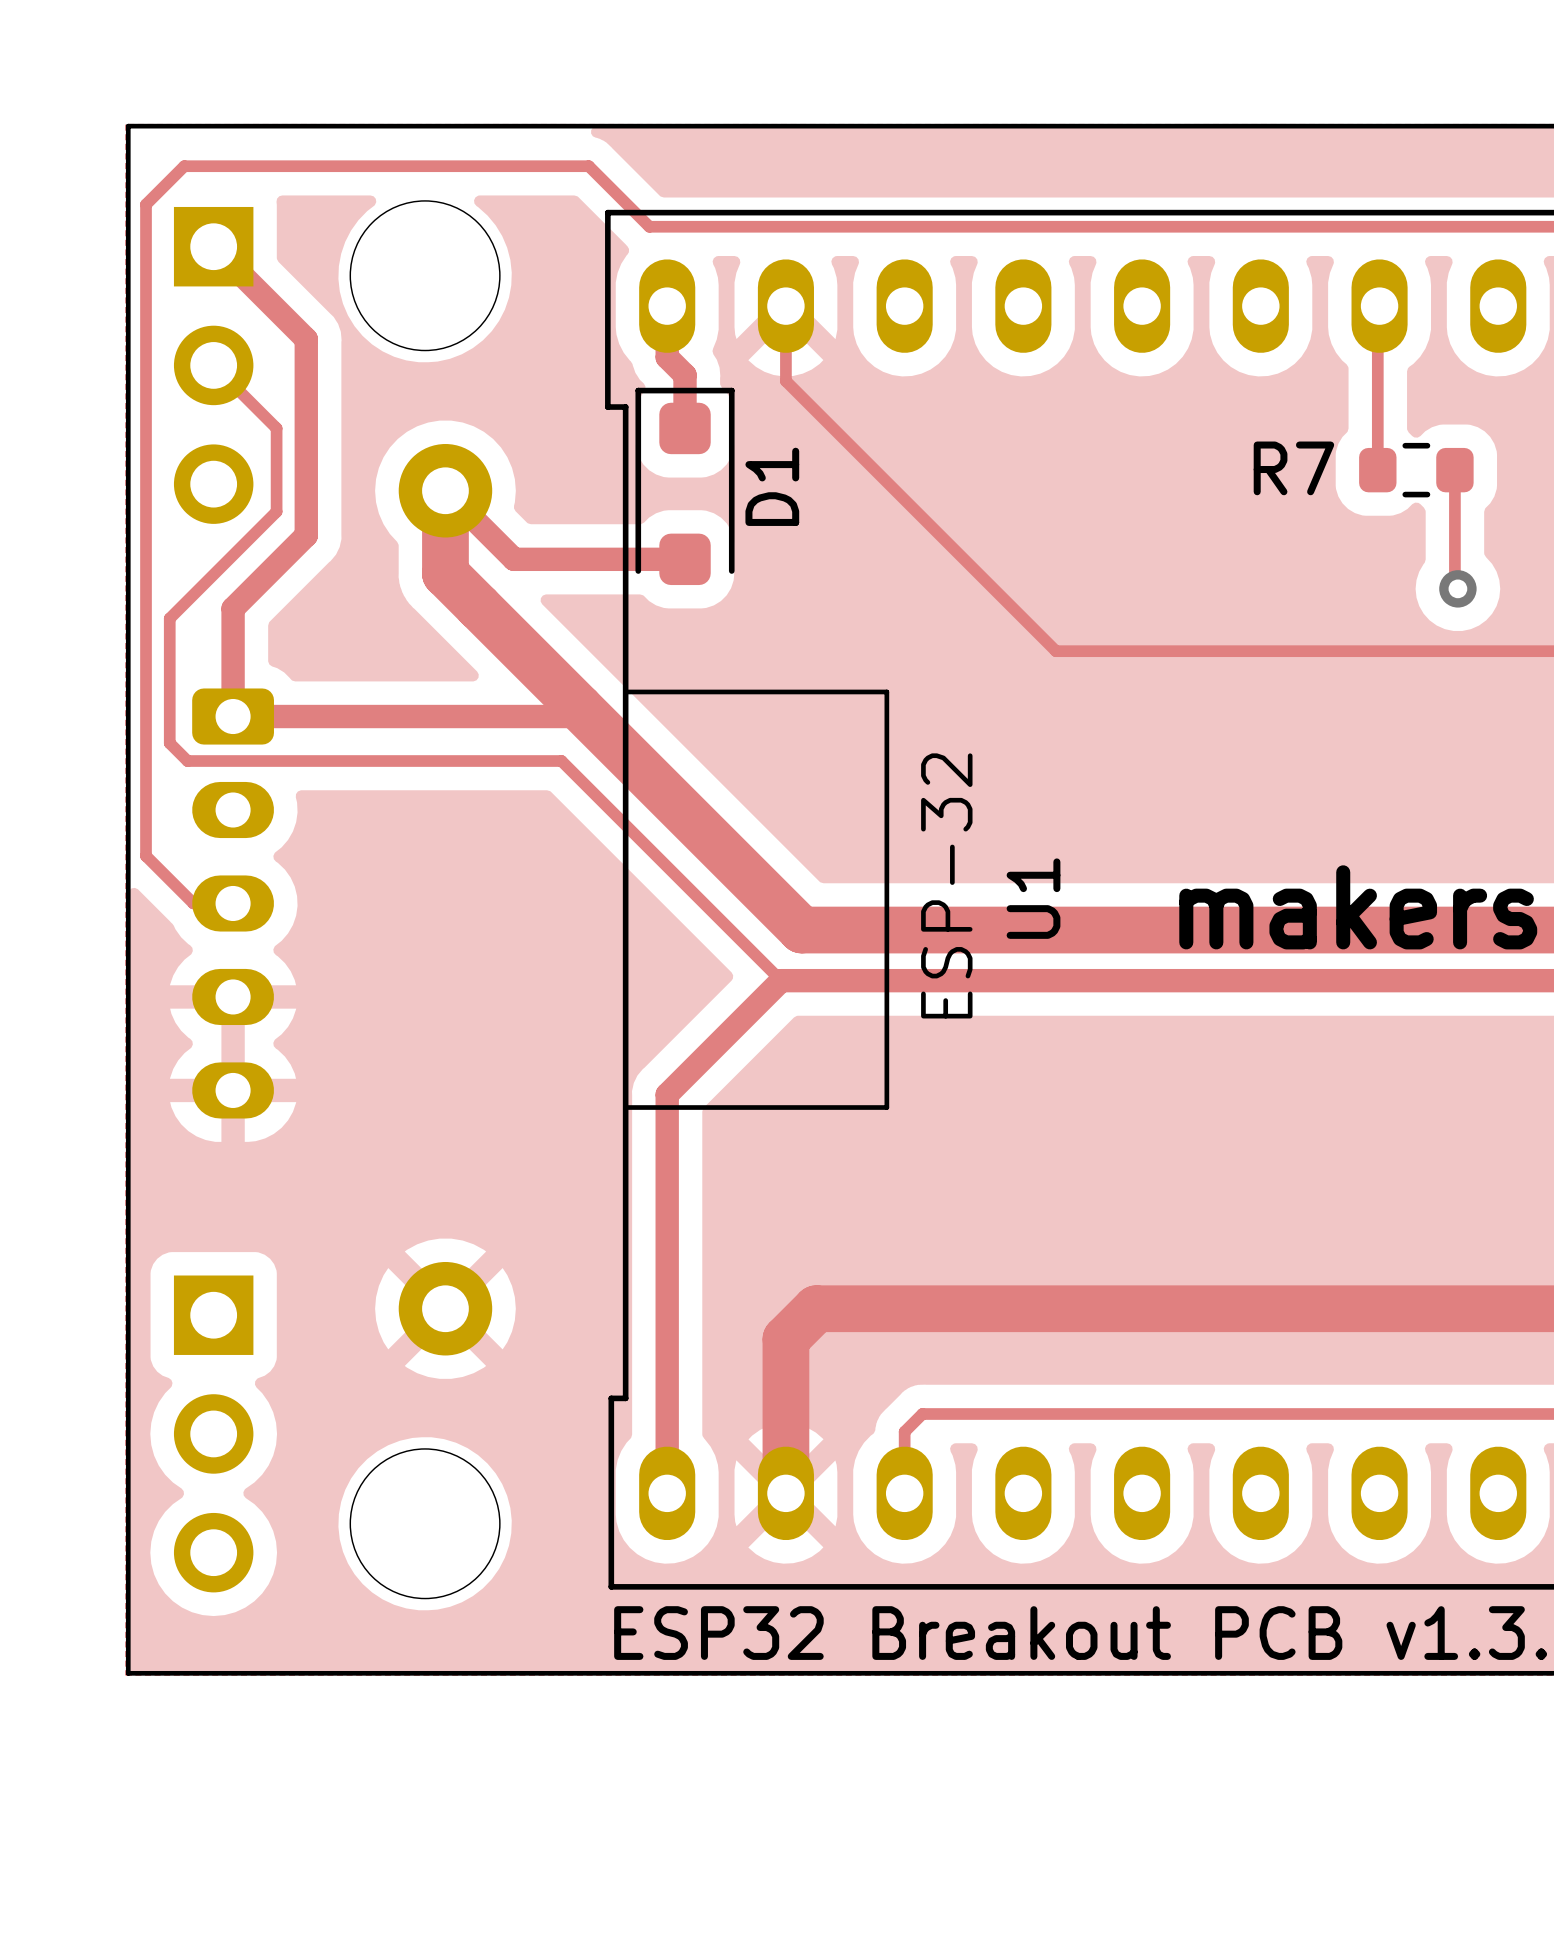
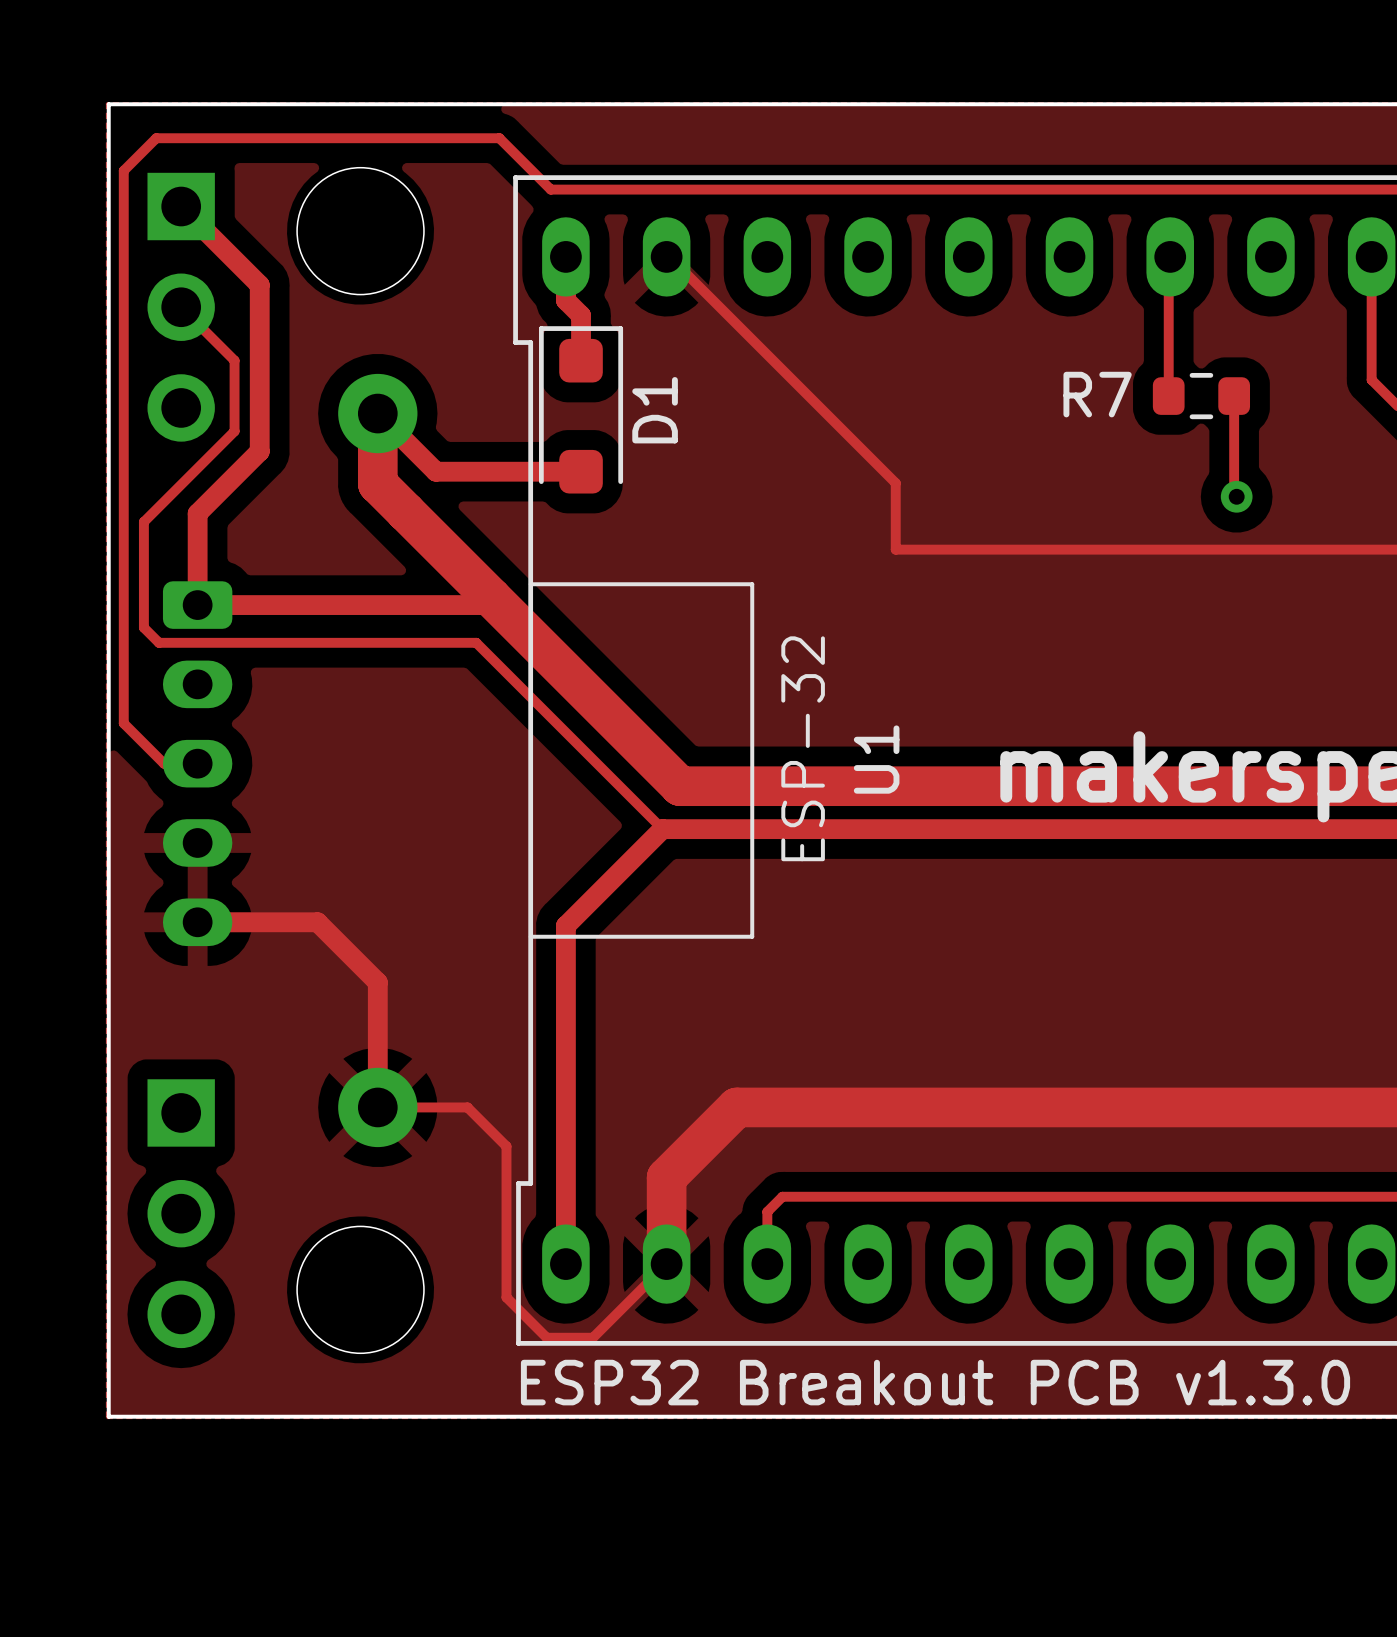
track: (785, 306) (785, 381) (1056, 651) -> (666, 256) (669, 256) (895, 483) (895, 549)
track: none -> (197, 922) (317, 922) (377, 982) (377, 1107) (467, 1107) (506, 1146) (506, 1297) (546, 1337) (592, 1337) (666, 1264)
track: (868, 1308) (816, 1308) (785, 1339) (785, 1391) -> (736, 1107) (666, 1177)

